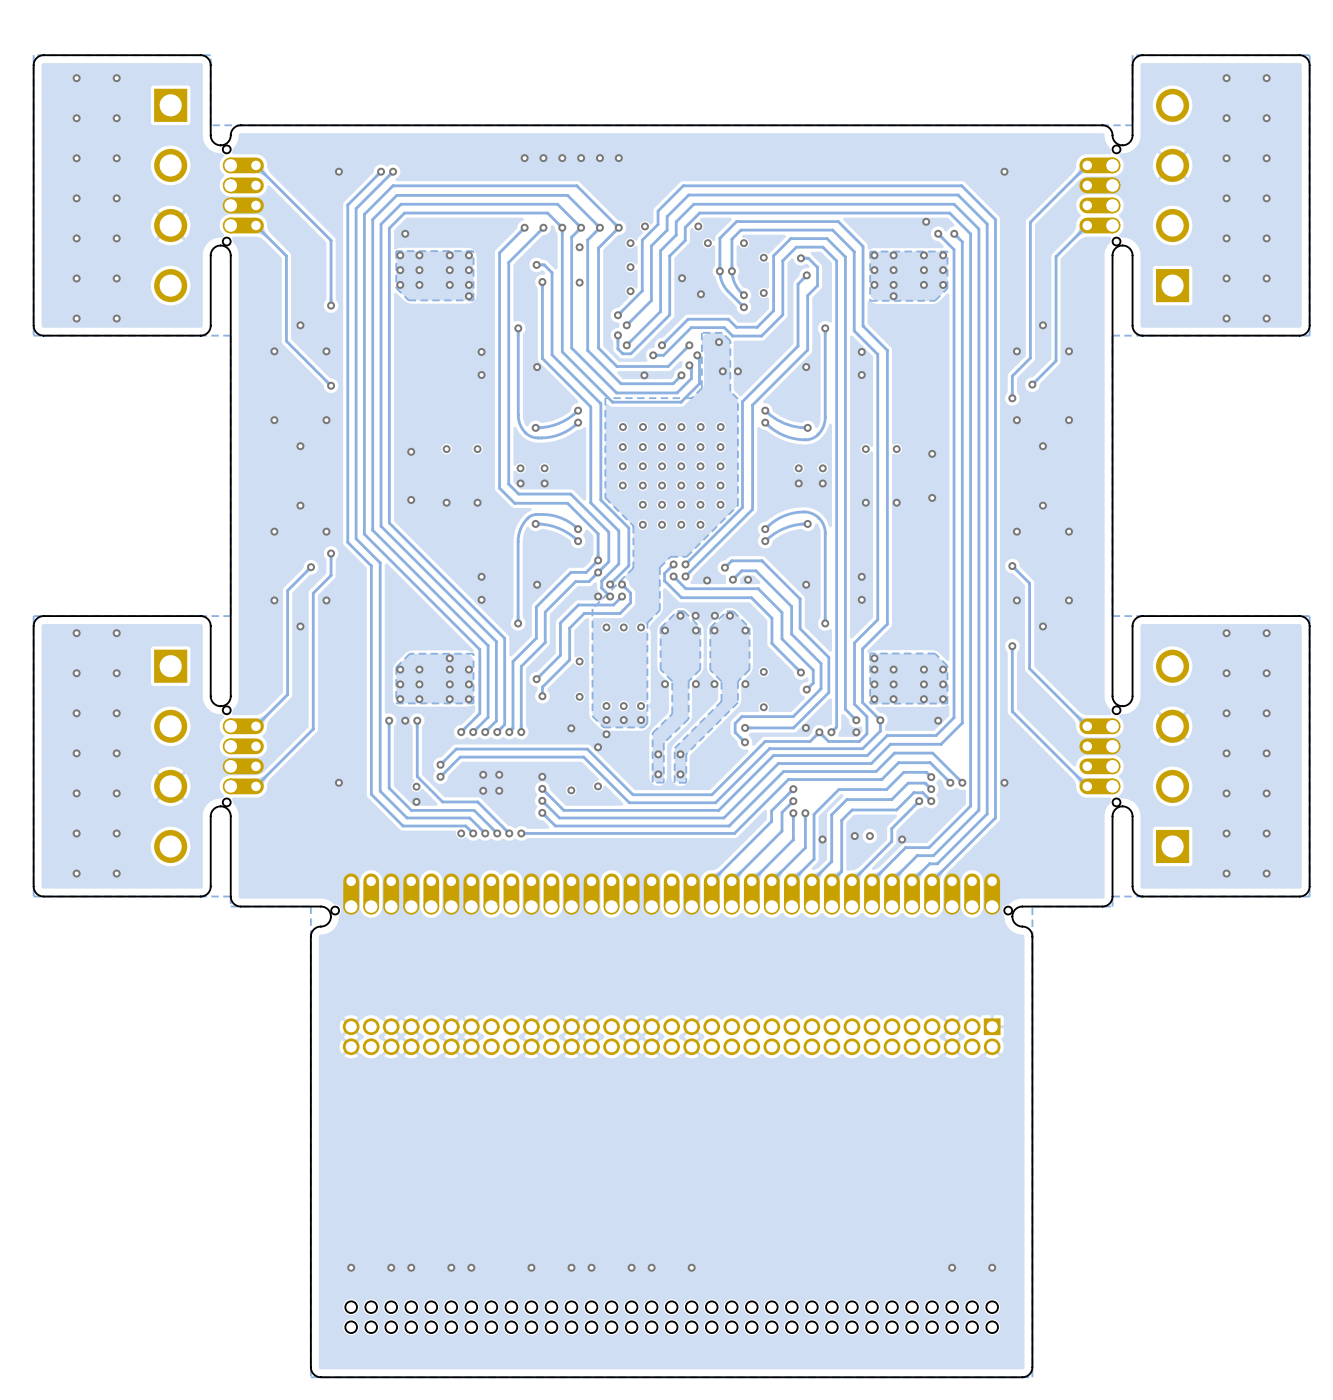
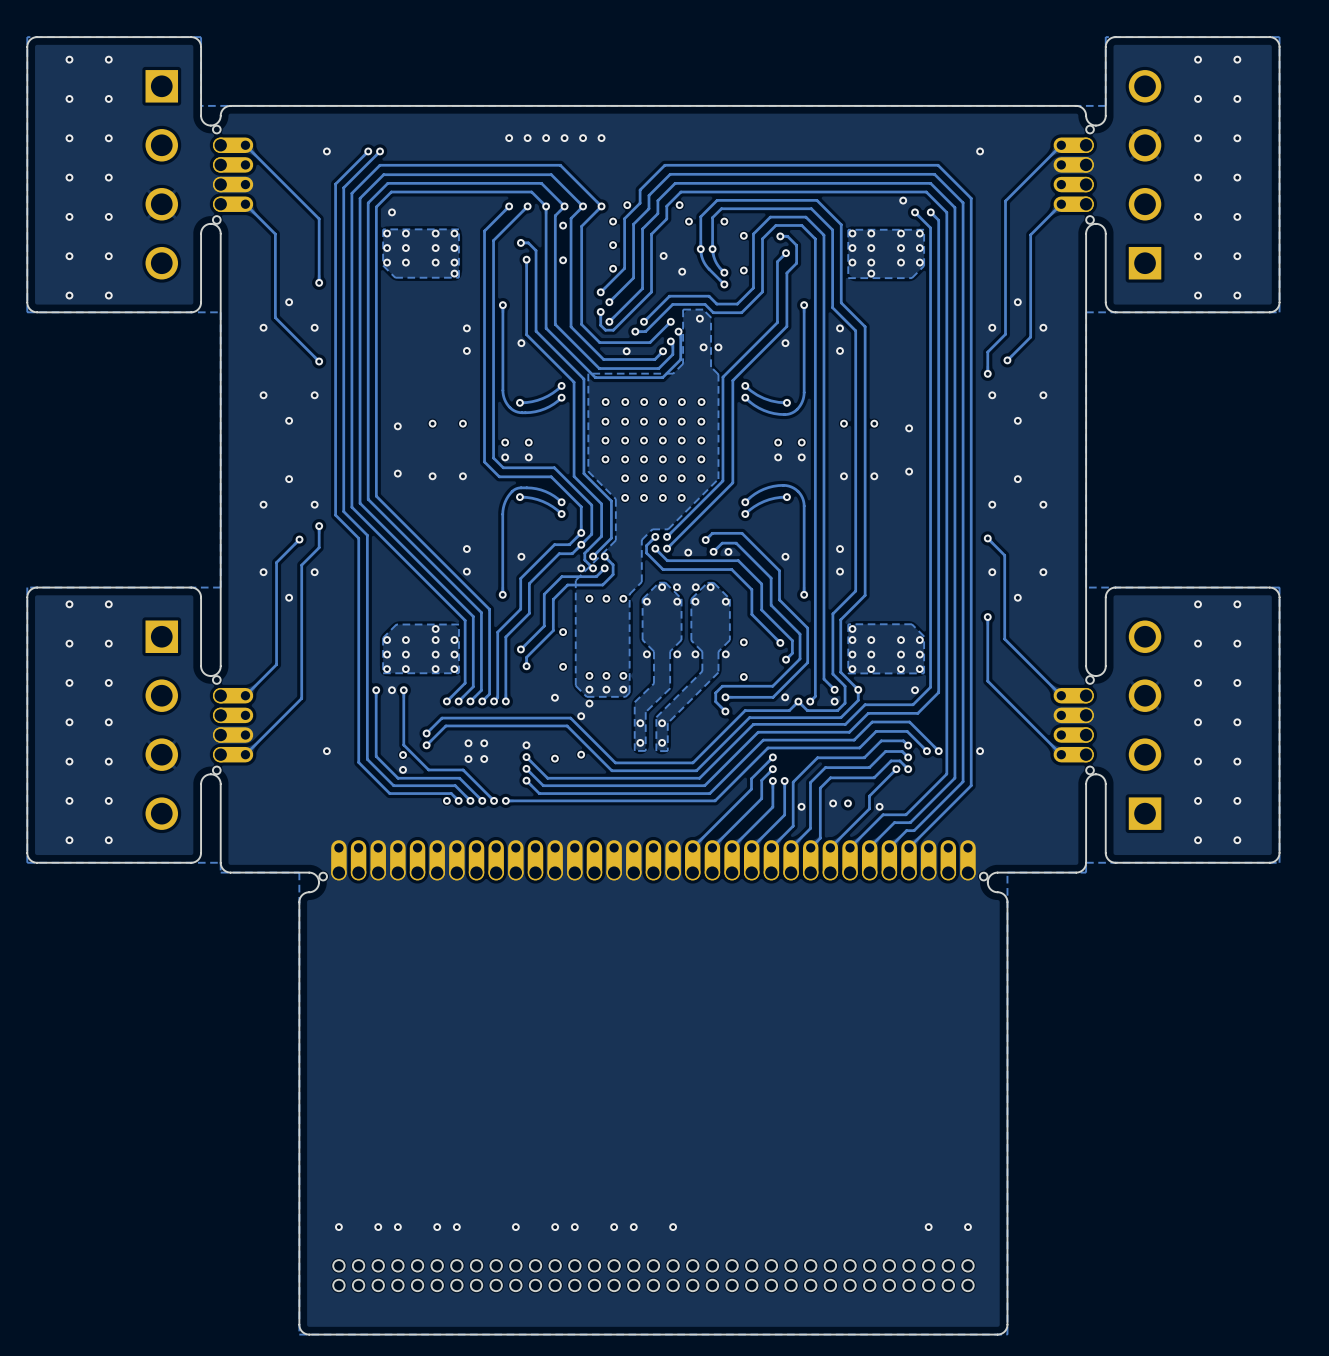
part: (671, 1036) -> none

